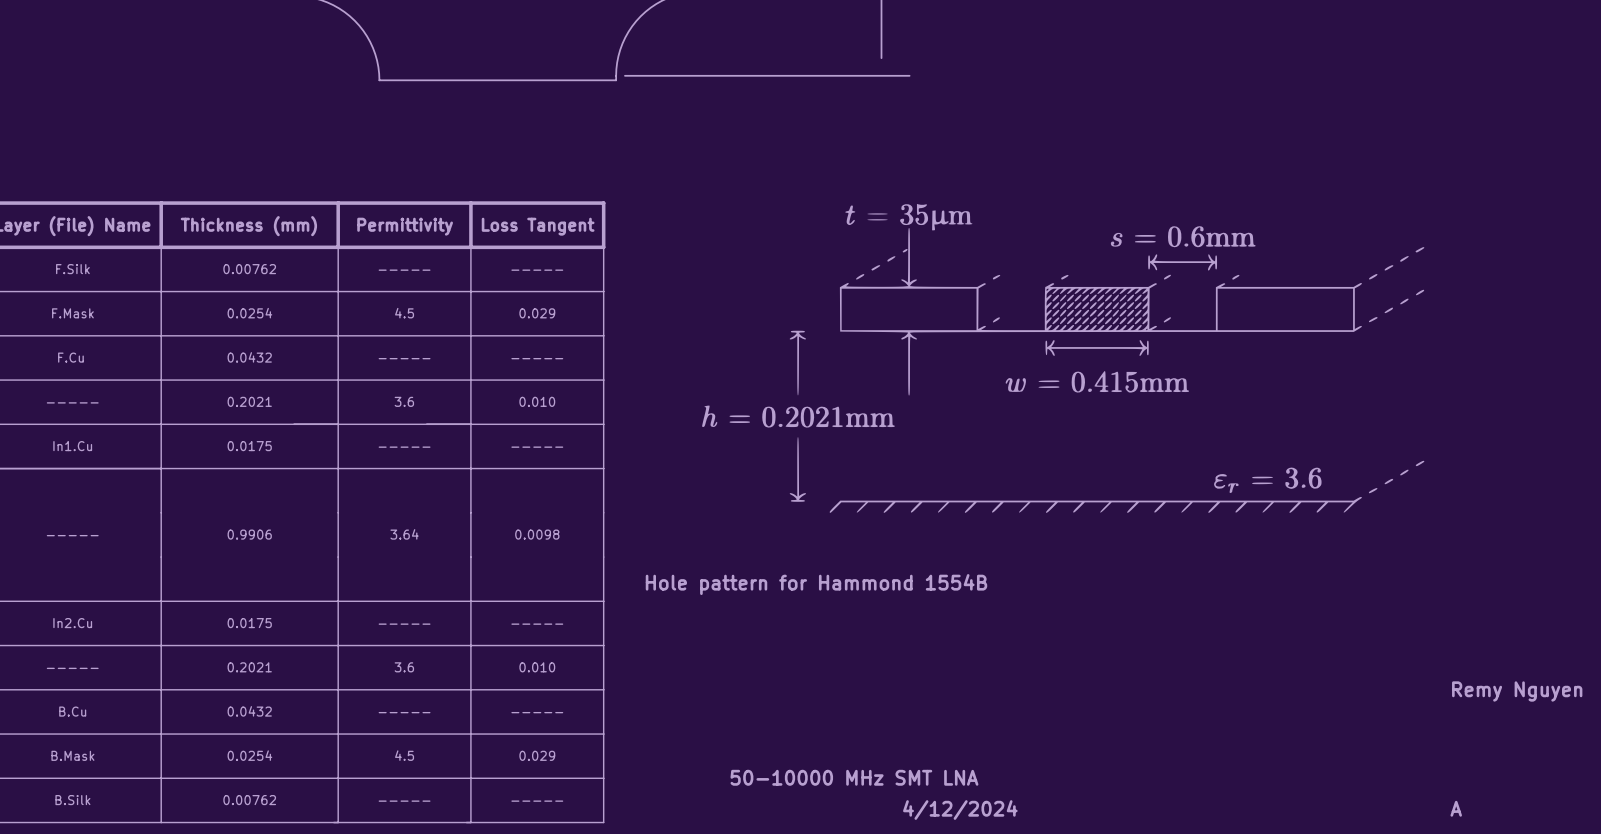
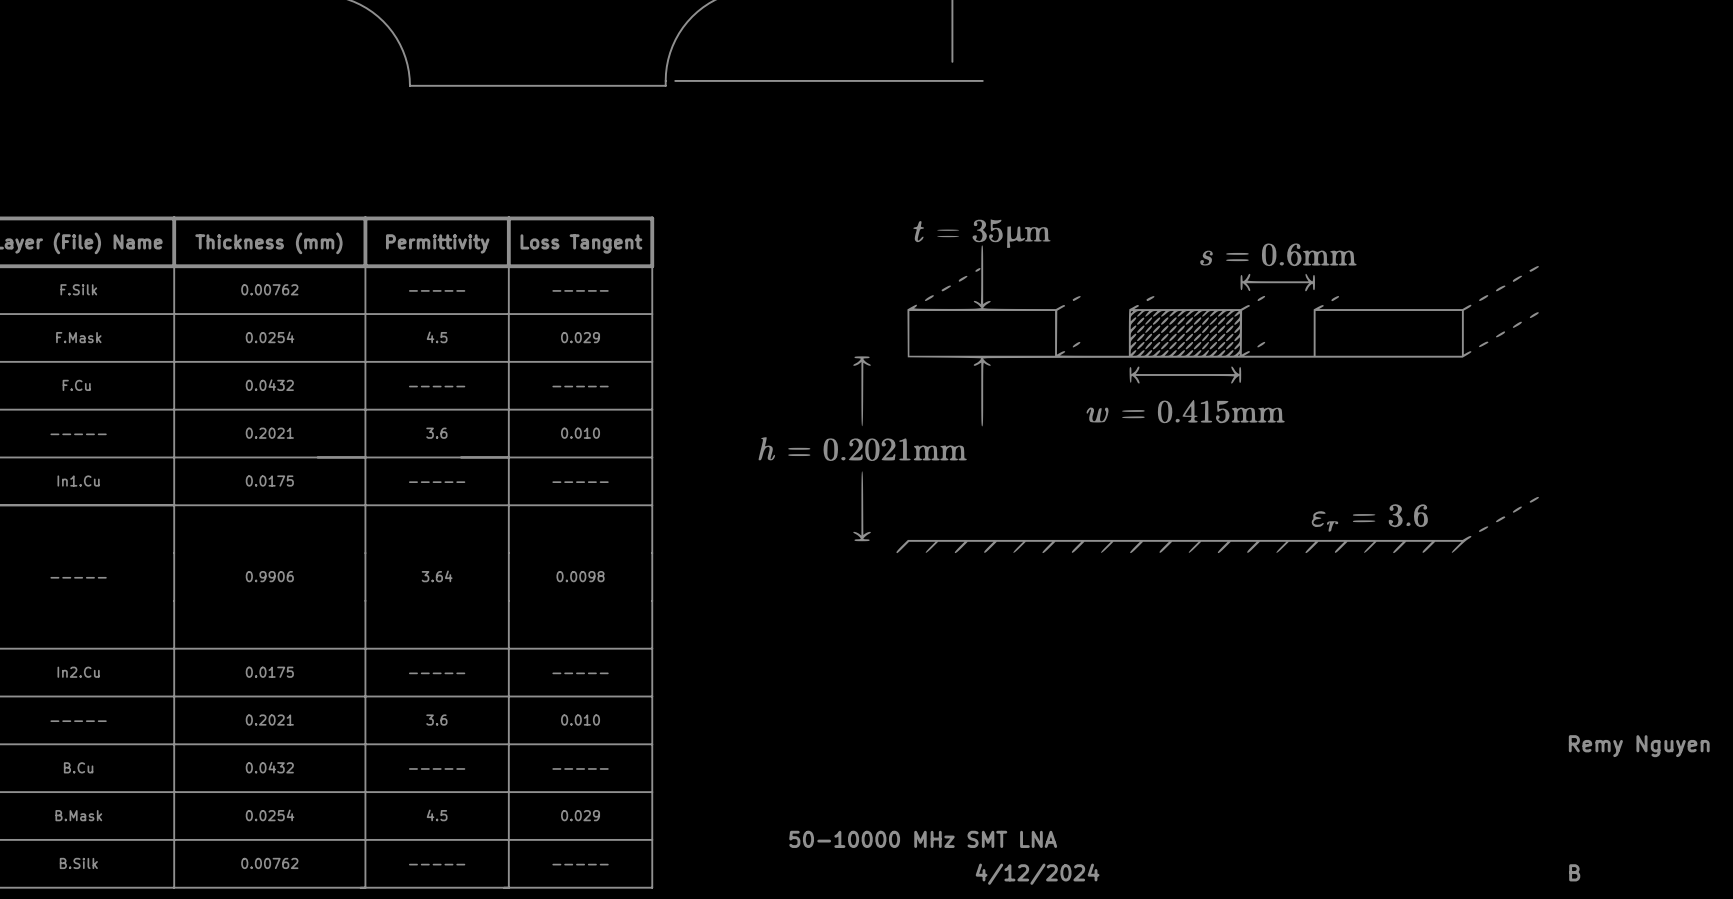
text: Hole pattern for Hammond 1554B (816, 584) -> none
text: A (1456, 808) -> B (1574, 872)

